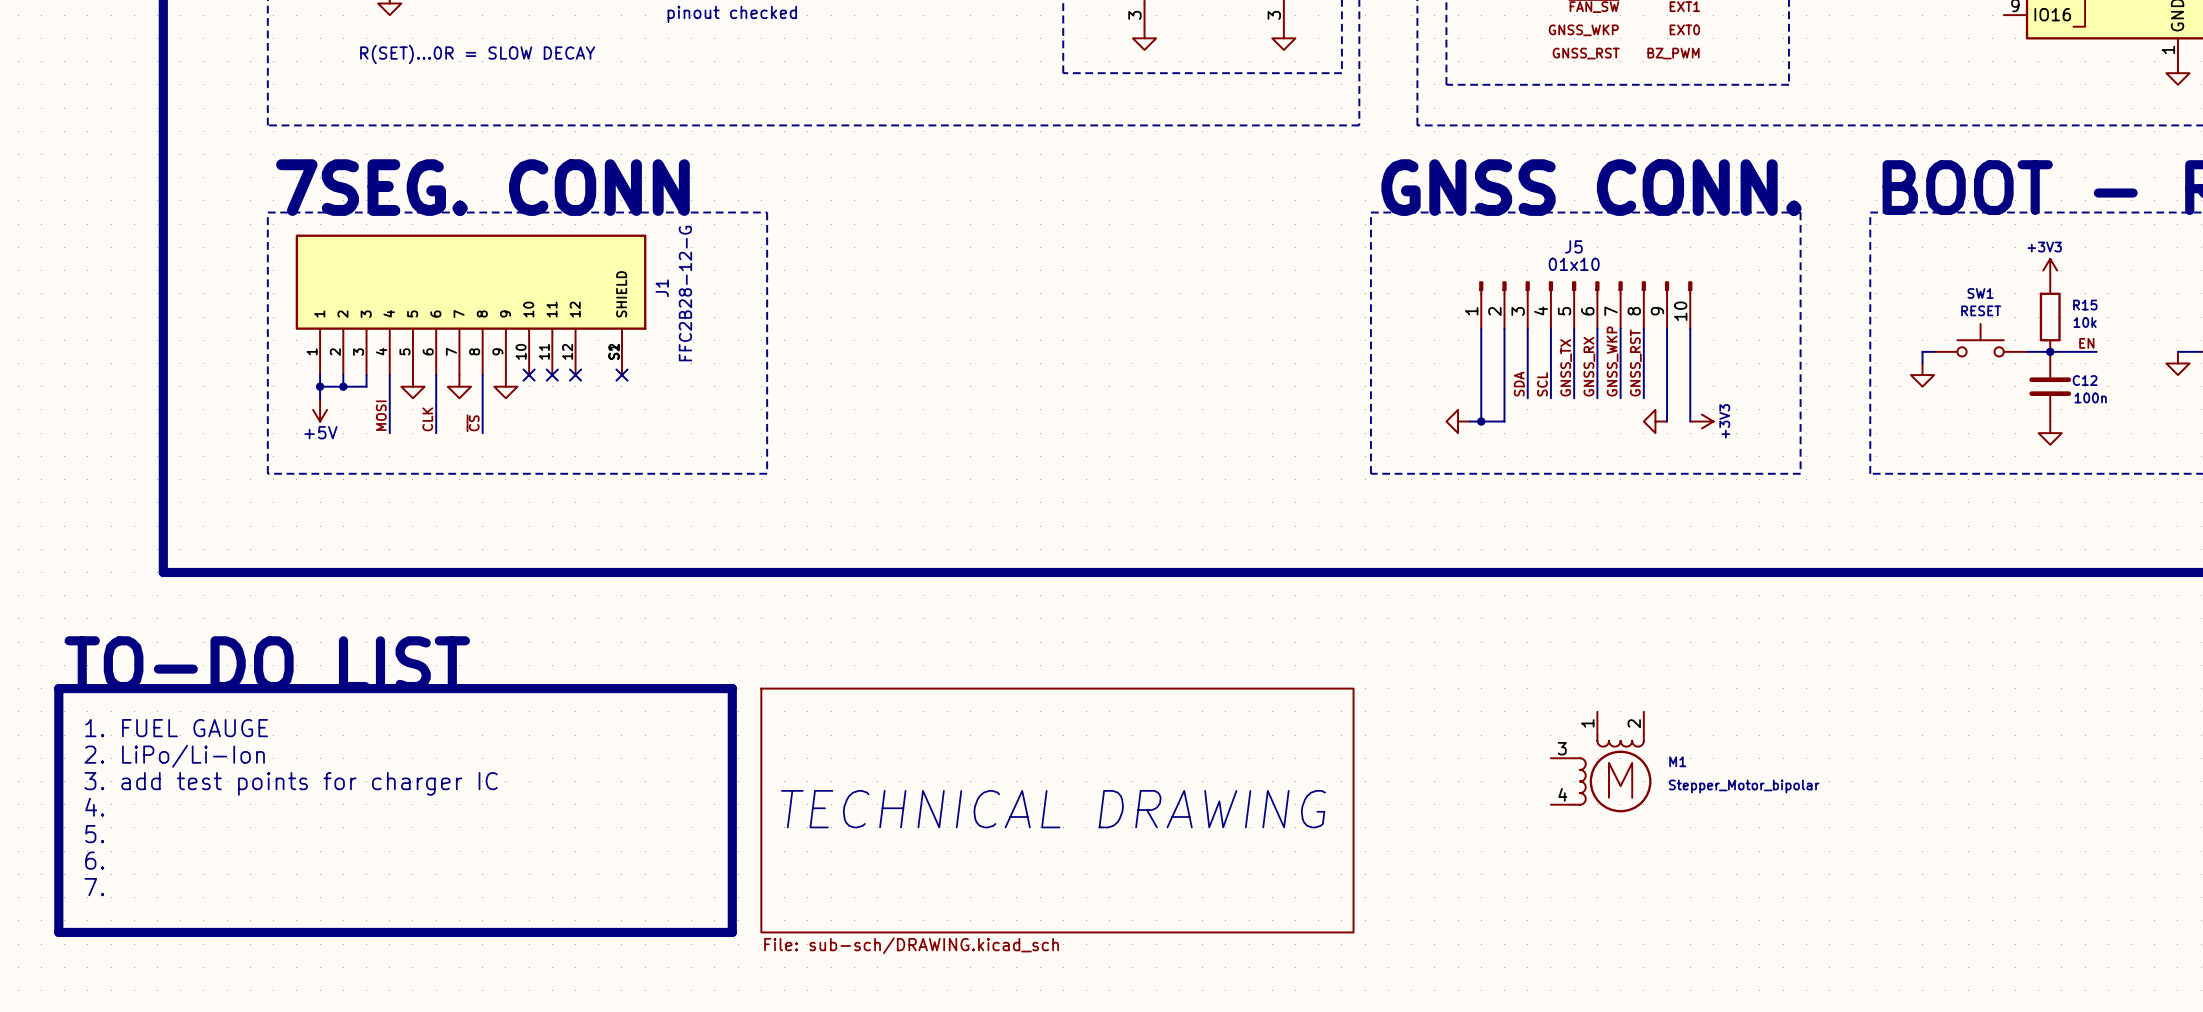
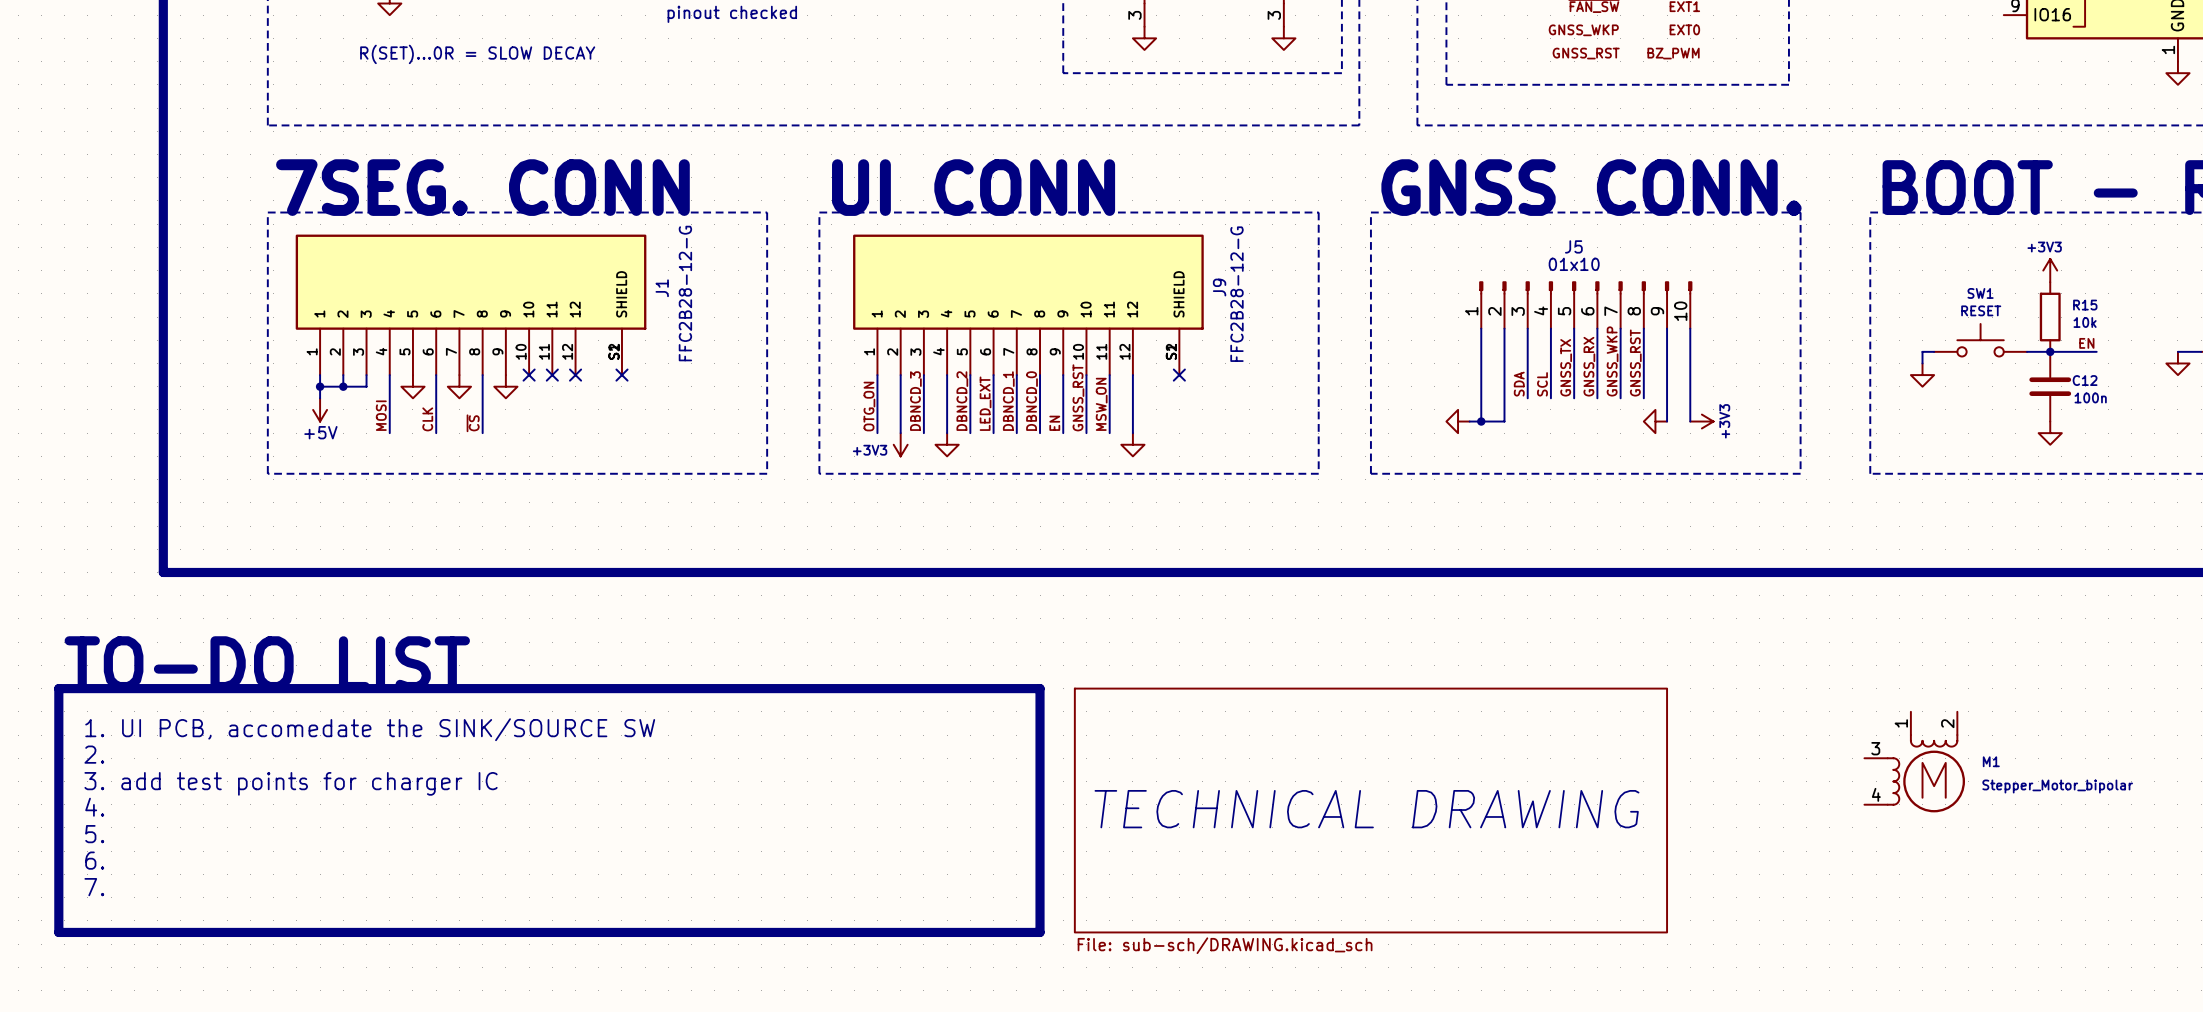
text: none -> UI CONN (973, 187)
line: none -> (819, 212) (1318, 212) (1318, 473) (819, 473) (819, 212)
J9: none -> FFC2B28-12-G (1028, 304)
wire: none -> (877, 375) (877, 433)
wire: none -> (900, 375) (900, 433)
wire: none -> (923, 375) (923, 433)
wire: none -> (947, 375) (947, 433)
wire: none -> (970, 375) (970, 433)
wire: none -> (993, 375) (993, 433)
wire: none -> (1016, 375) (1016, 433)
wire: none -> (1040, 375) (1040, 433)
wire: none -> (1063, 375) (1063, 433)
wire: none -> (1086, 375) (1086, 433)
wire: none -> (1109, 375) (1109, 433)
wire: none -> (1132, 375) (1132, 433)
no-connect mark: none -> (1179, 375)
label: none -> GNSS_RST (1078, 397)
label: none -> DBNCD_3 (915, 401)
label: none -> DBNCD_2 (962, 401)
label: none -> DBNCD_1 (1008, 401)
label: none -> DBNCD_0 (1032, 401)
label: none -> LED_EXT (985, 403)
label: none -> MSW_ON (1101, 404)
label: none -> OTG_ON (869, 406)
label: none -> EN (1054, 423)
power symbol: none -> +3V3 (900, 444)
power symbol: none -> (947, 444)
power symbol: none -> (1132, 444)
line: (732, 688) (732, 932) -> (732, 688) (1040, 688) (1040, 932) (732, 932)
text: 1. FUEL GAUGE (176, 728) -> 1. UI PCB, accomedate the SINK/SOURCE SW (370, 729)
text: 2. LiPo/Li-Ion (174, 756) -> 2. (94, 754)
M1 position: (1601, 762) -> (1914, 762)
sheet TECHNICAL DRAWING: File: sub-sch/DRAWING.kicad_sch (1057, 810) -> none
sheet TECHNICAL DRAWING: none -> File: sub-sch/DRAWING.kicad_sch (1370, 810)

